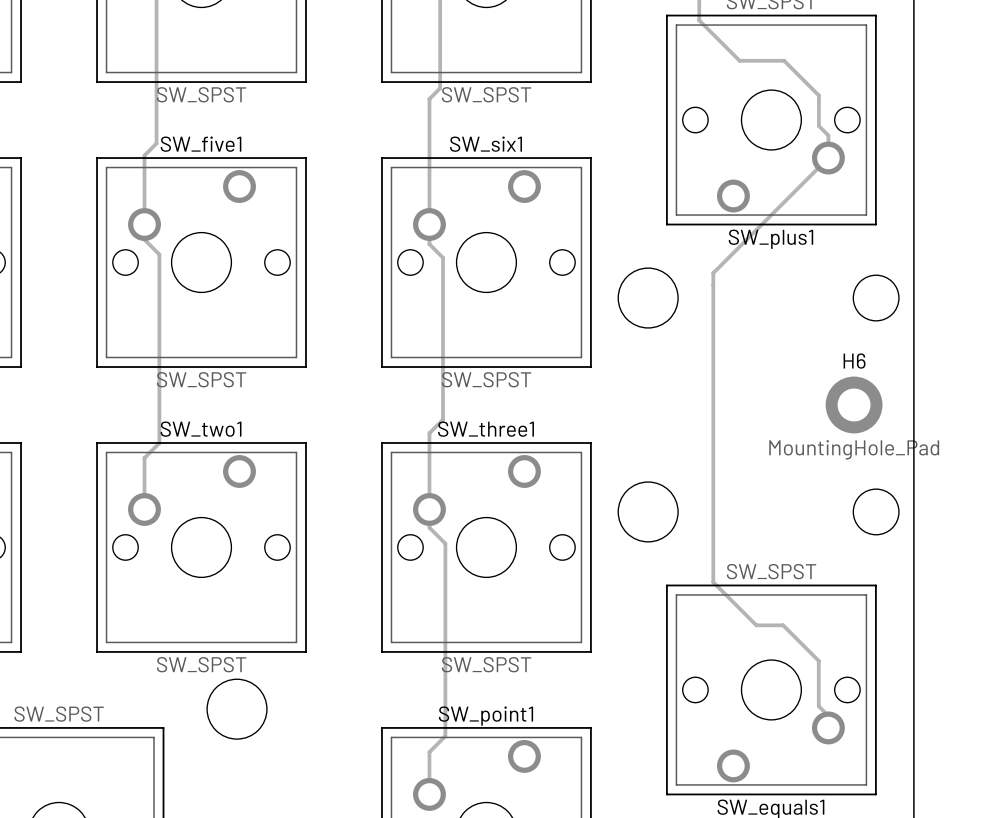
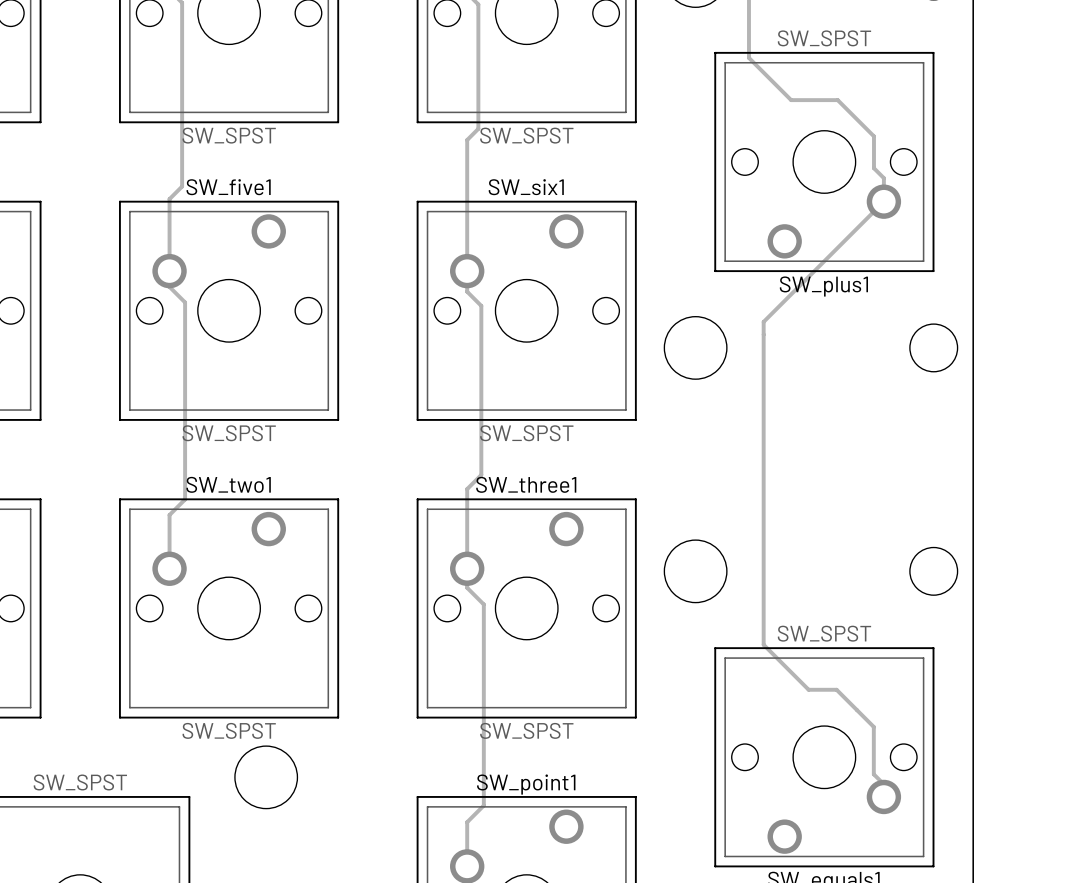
H6: MountingHole_Pad (854, 404) -> none

